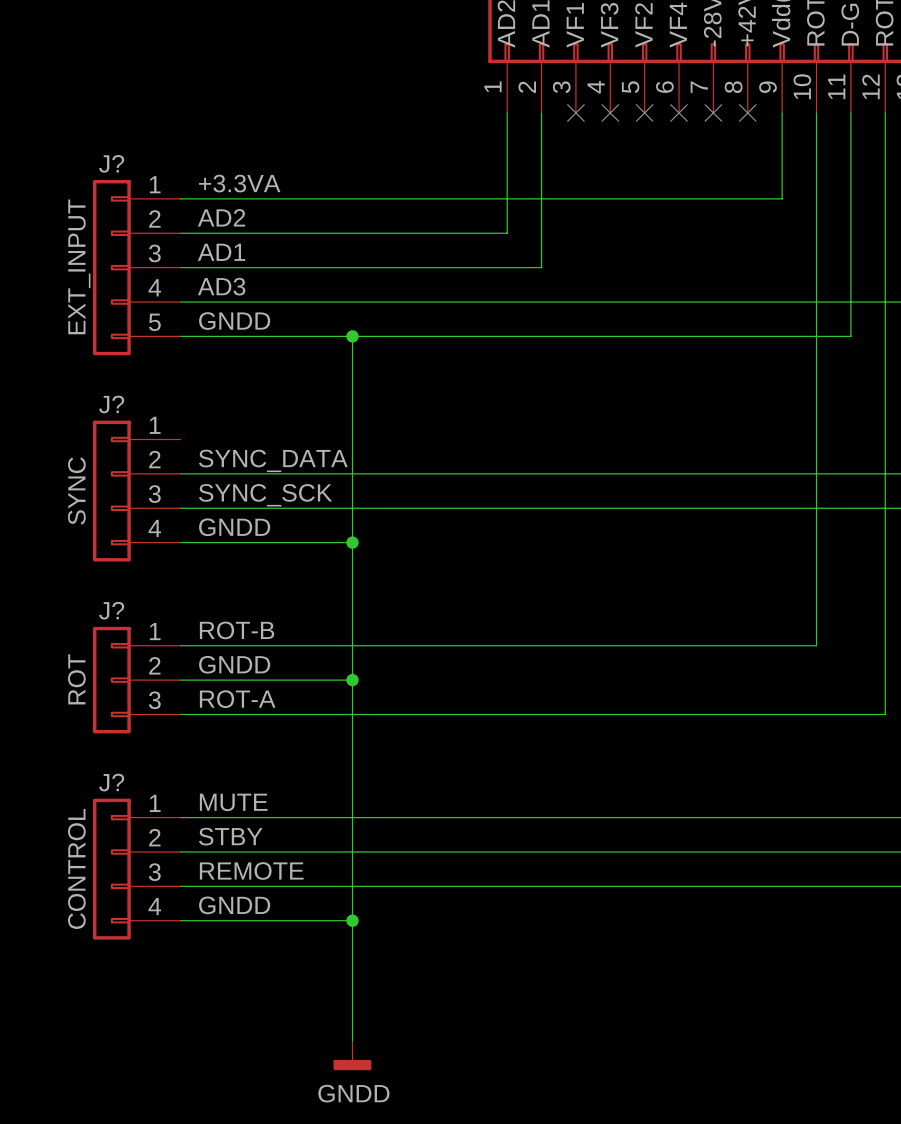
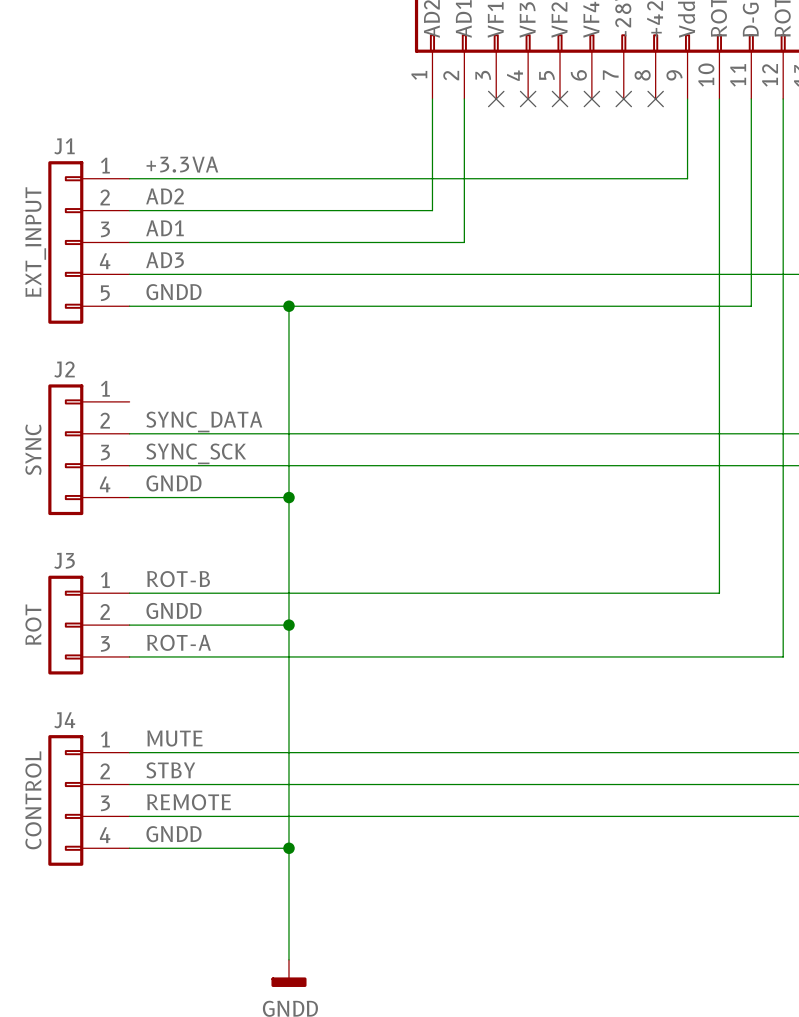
J? name: J? (111, 163) -> J1 (64, 146)
J? name: J? (111, 404) -> J2 (64, 369)
J? name: J? (111, 610) -> J3 (64, 560)
J? name: J? (111, 782) -> J4 (64, 720)

